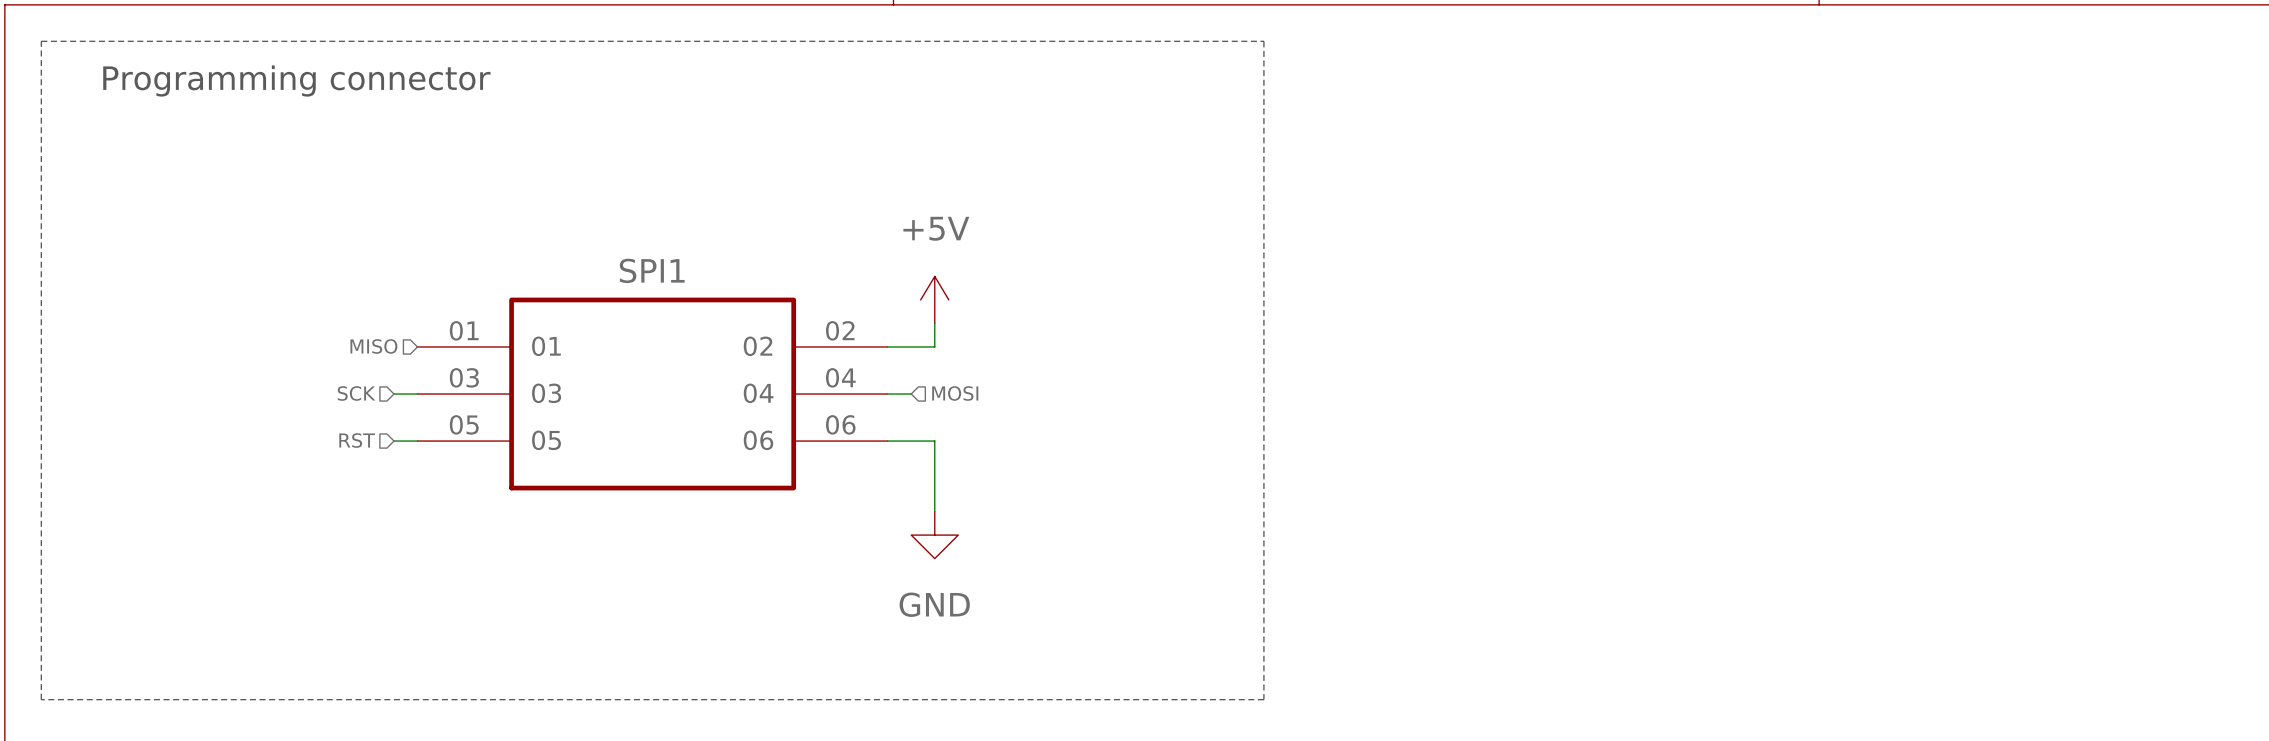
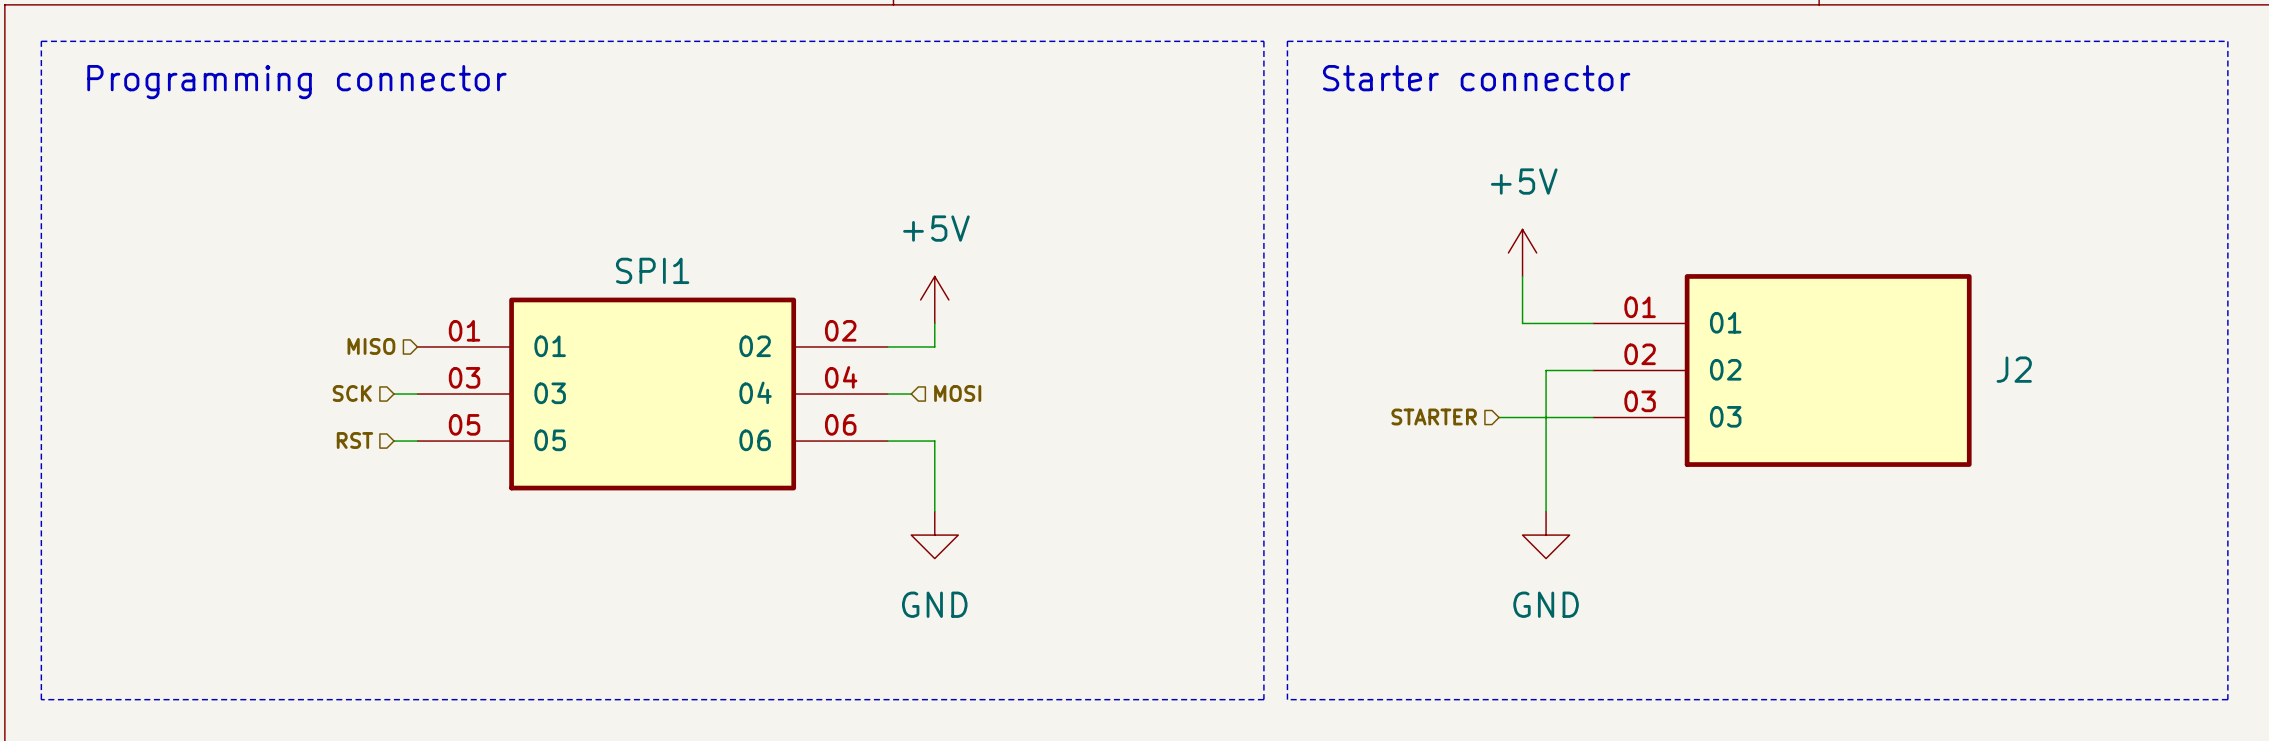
line: none -> (1287, 41) (2227, 41) (2227, 699) (1287, 699) (1287, 41)
text: none -> Starter connector (1476, 78)
power symbol: none -> +5V (1522, 252)
wire: none -> (1522, 276) (1522, 323) (1593, 323)
wire: none -> (1593, 370) (1546, 370) (1546, 511)
J2: none -> (1782, 370)
hierarchical label: none -> STARTER (1434, 416)
wire: none -> (1499, 417) (1593, 417)
power symbol: none -> GND (1546, 535)

